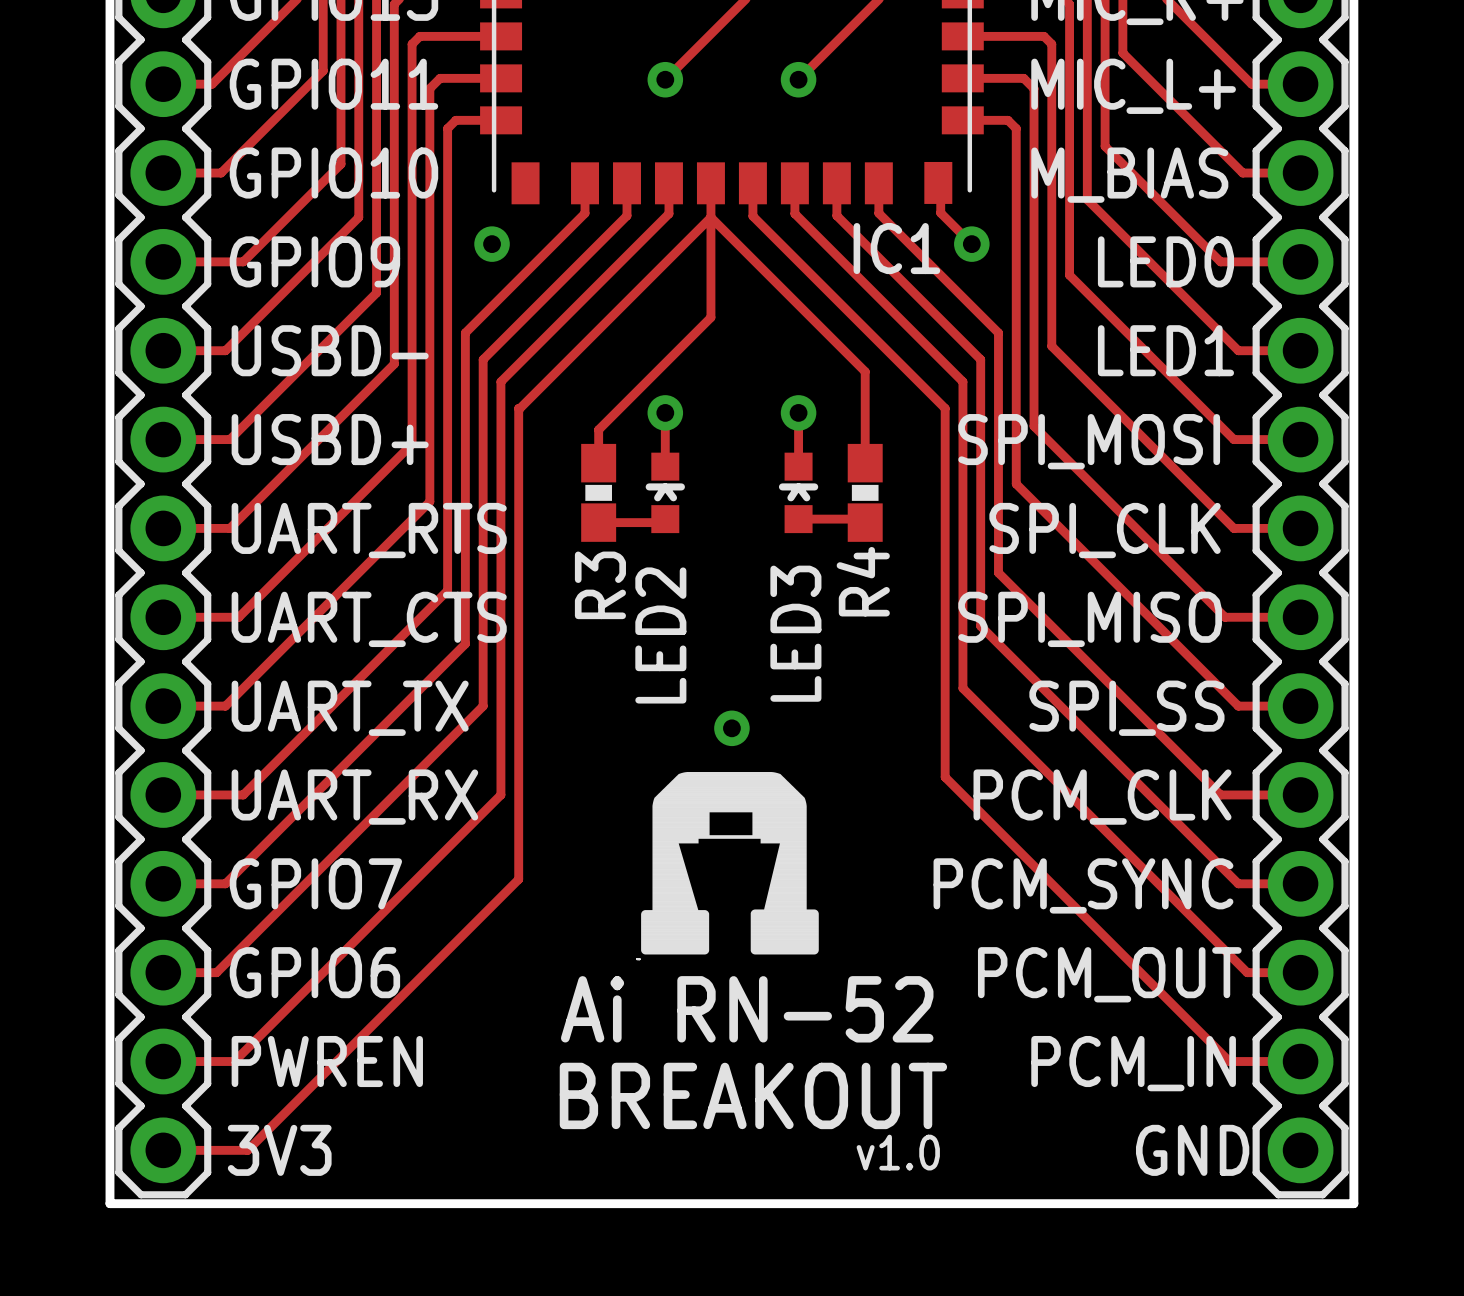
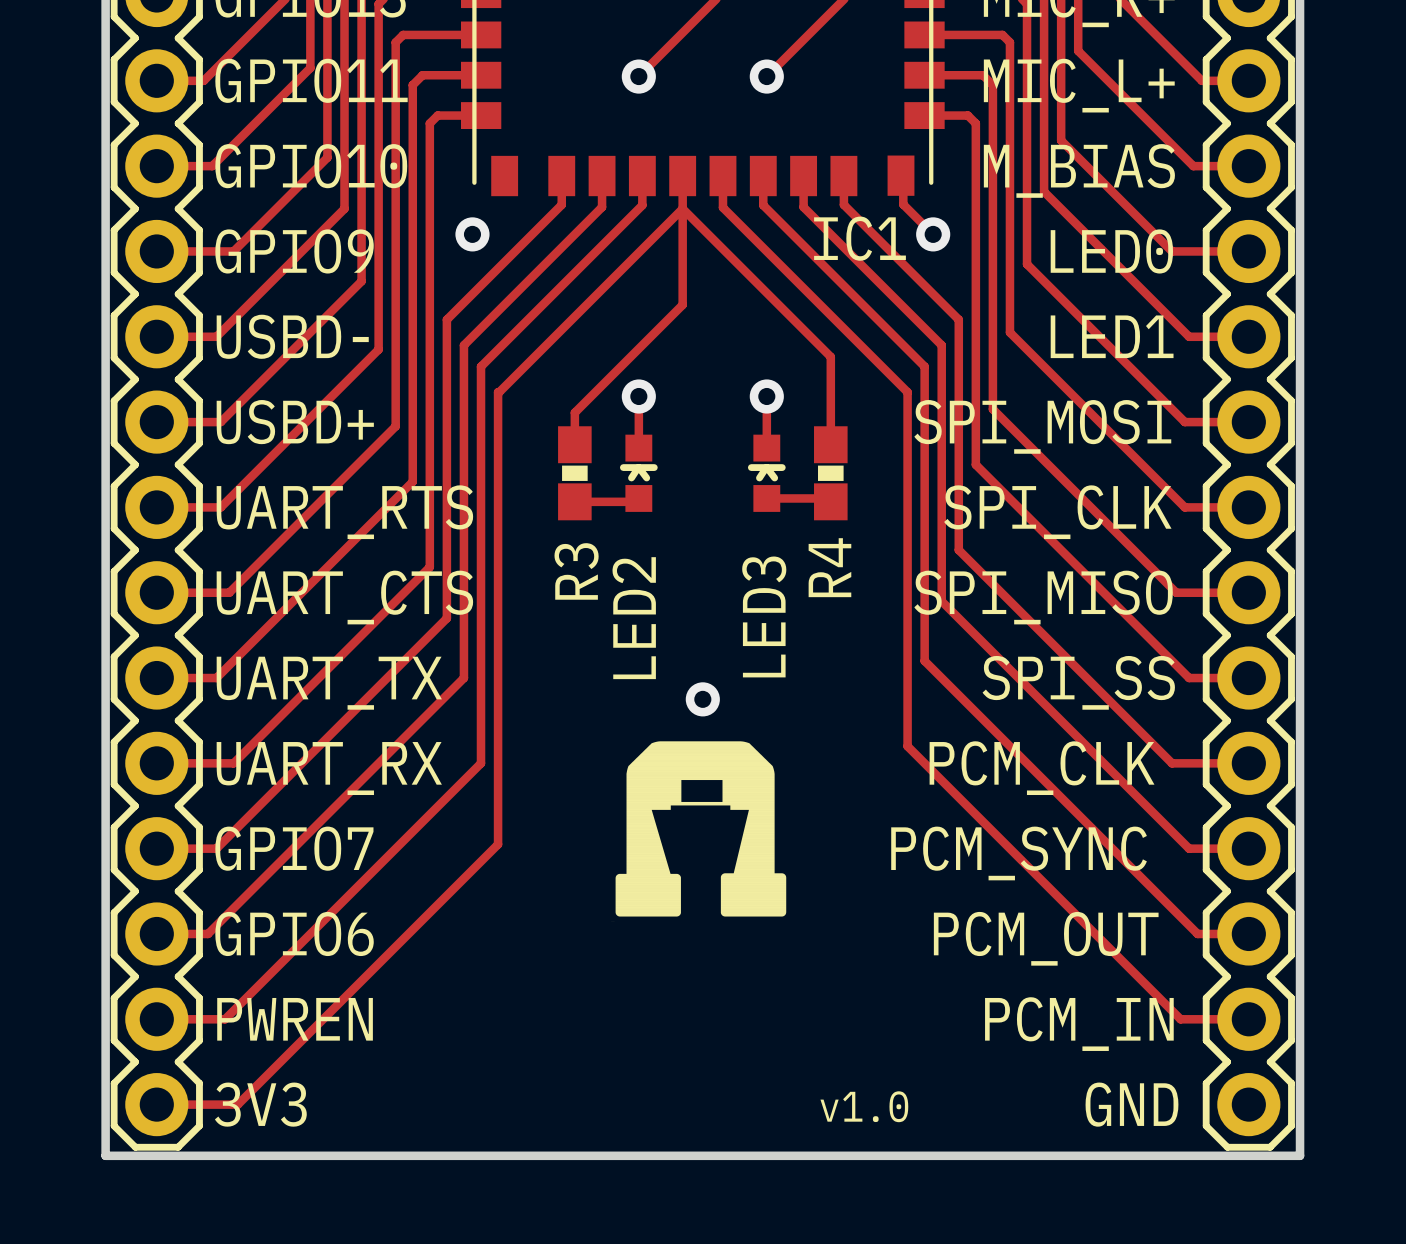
text: Ai RN-52 (747, 1009) -> none
text: BREAKOUT (753, 1095) -> none

